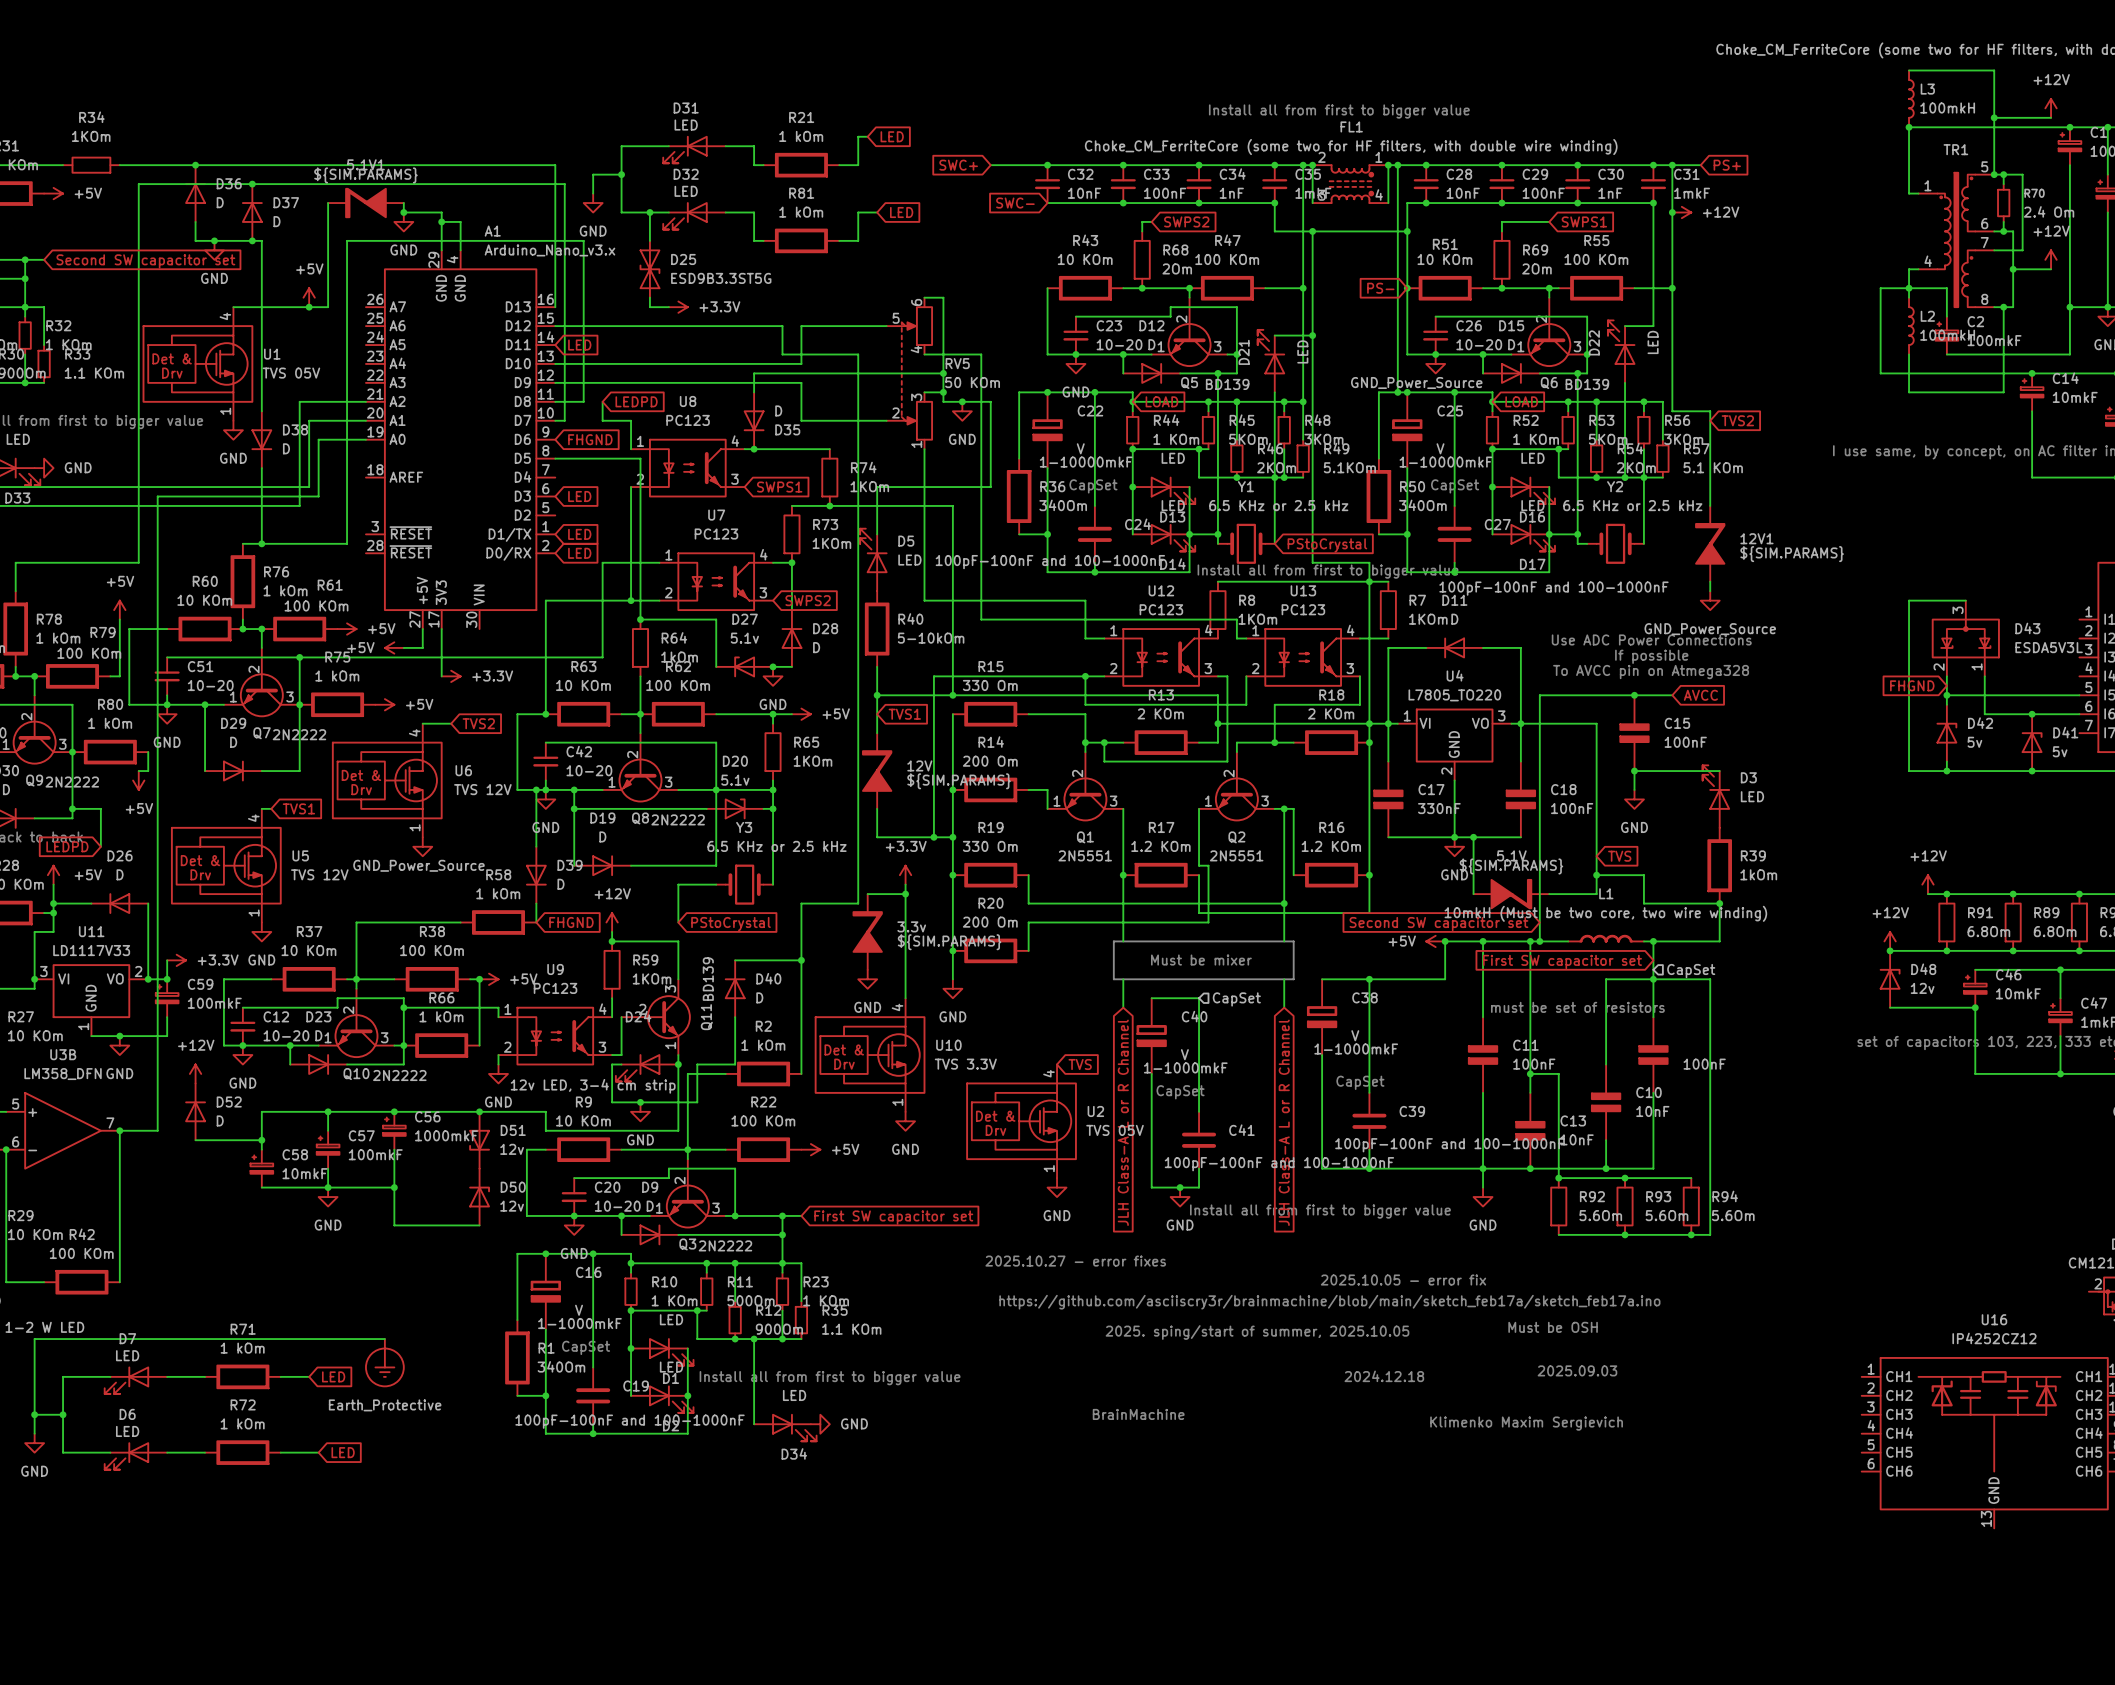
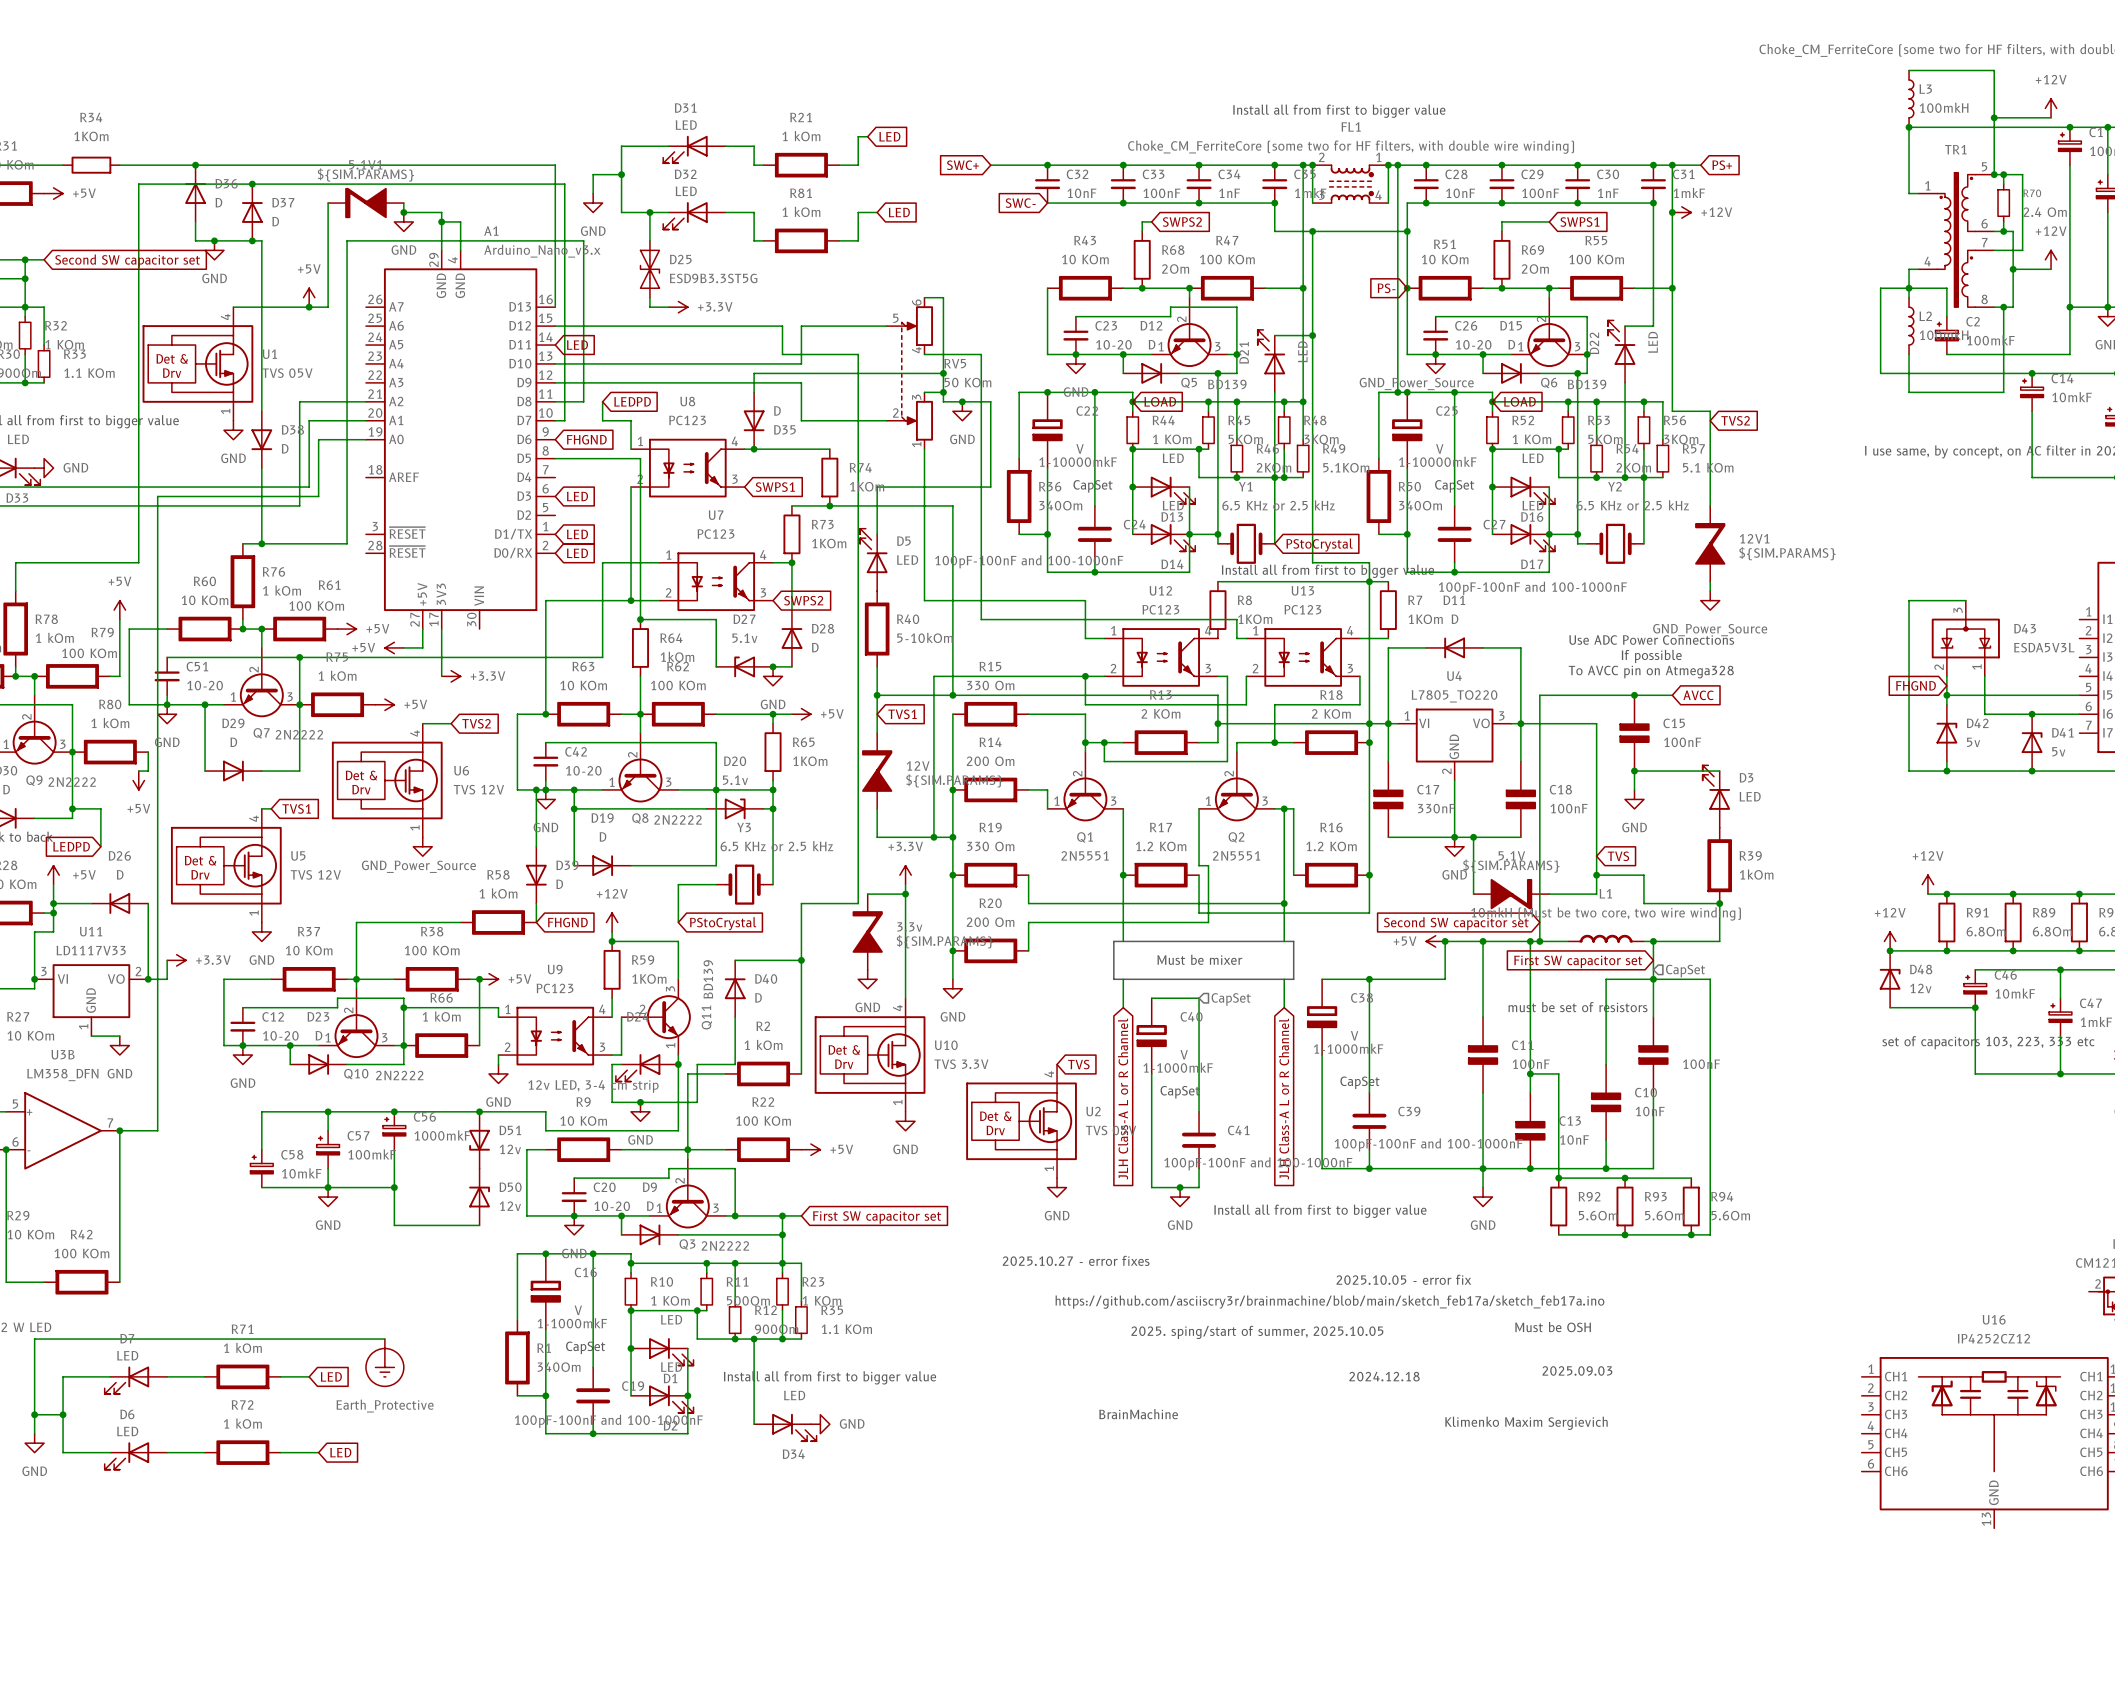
junction: (167, 979) -> none
C59: 100mkF (167, 998) -> none
wire: (167, 1017) (167, 1036) (119, 1036) -> none
junction: (119, 1036) -> none
power symbol: +12V (195, 1073) -> none
D52: D (195, 1111) -> none
wire: (195, 1140) (261, 1140) -> none
junction: (261, 1140) -> none

